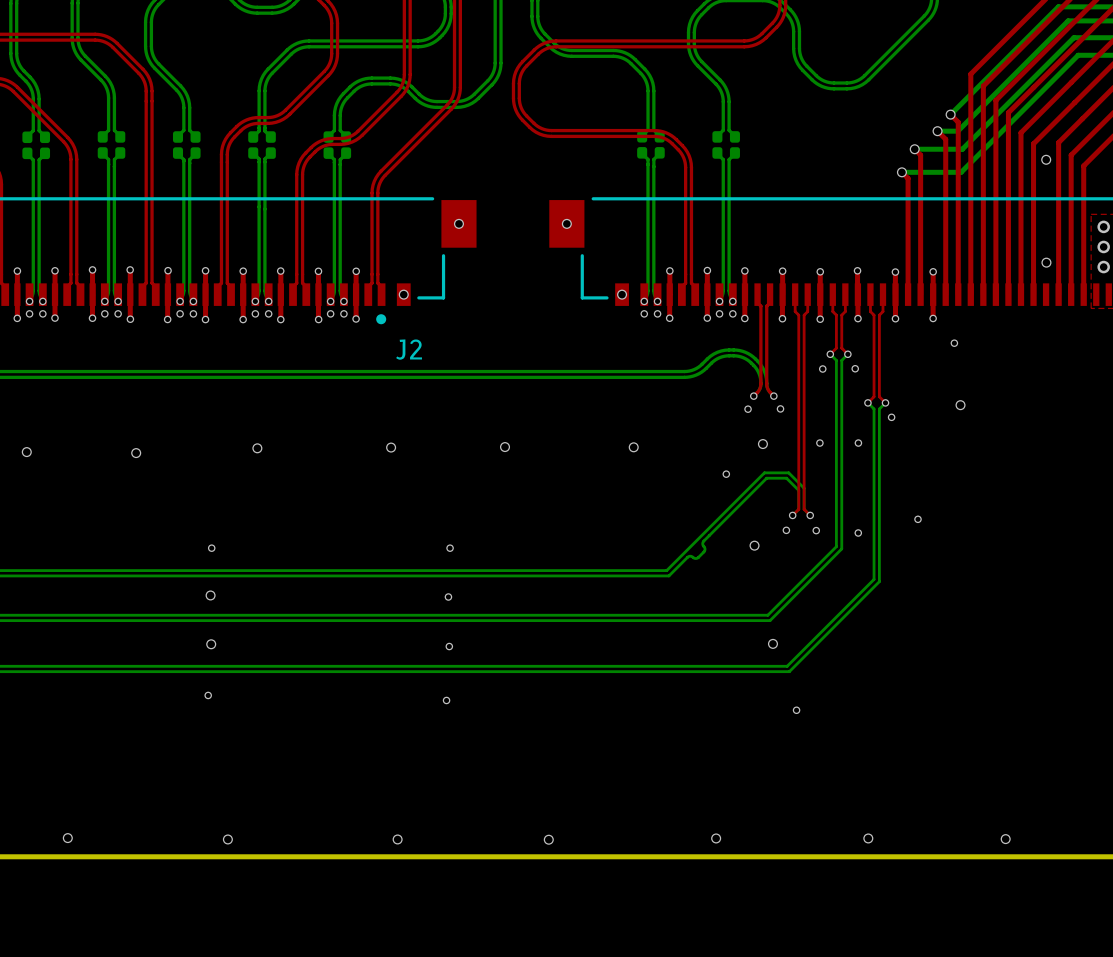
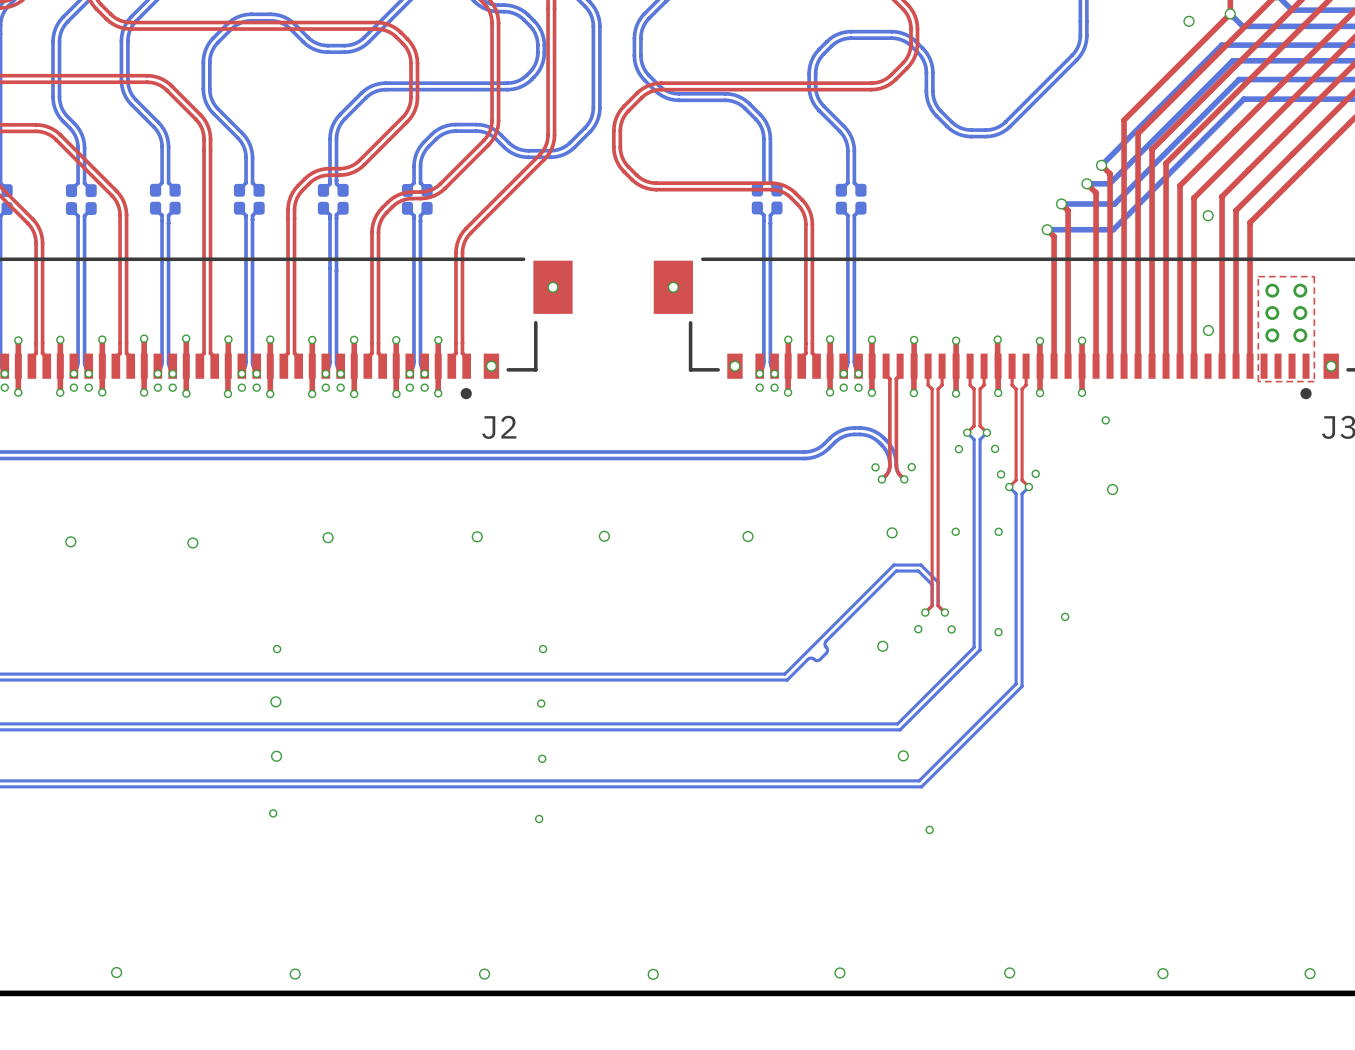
via: none -> (875, 467)
via: none -> (911, 467)
via: none -> (1001, 474)
via: none -> (1035, 473)
via: (780, 408) -> none
via: (748, 409) -> none
via: (891, 417) -> none
via: (726, 474) -> none

